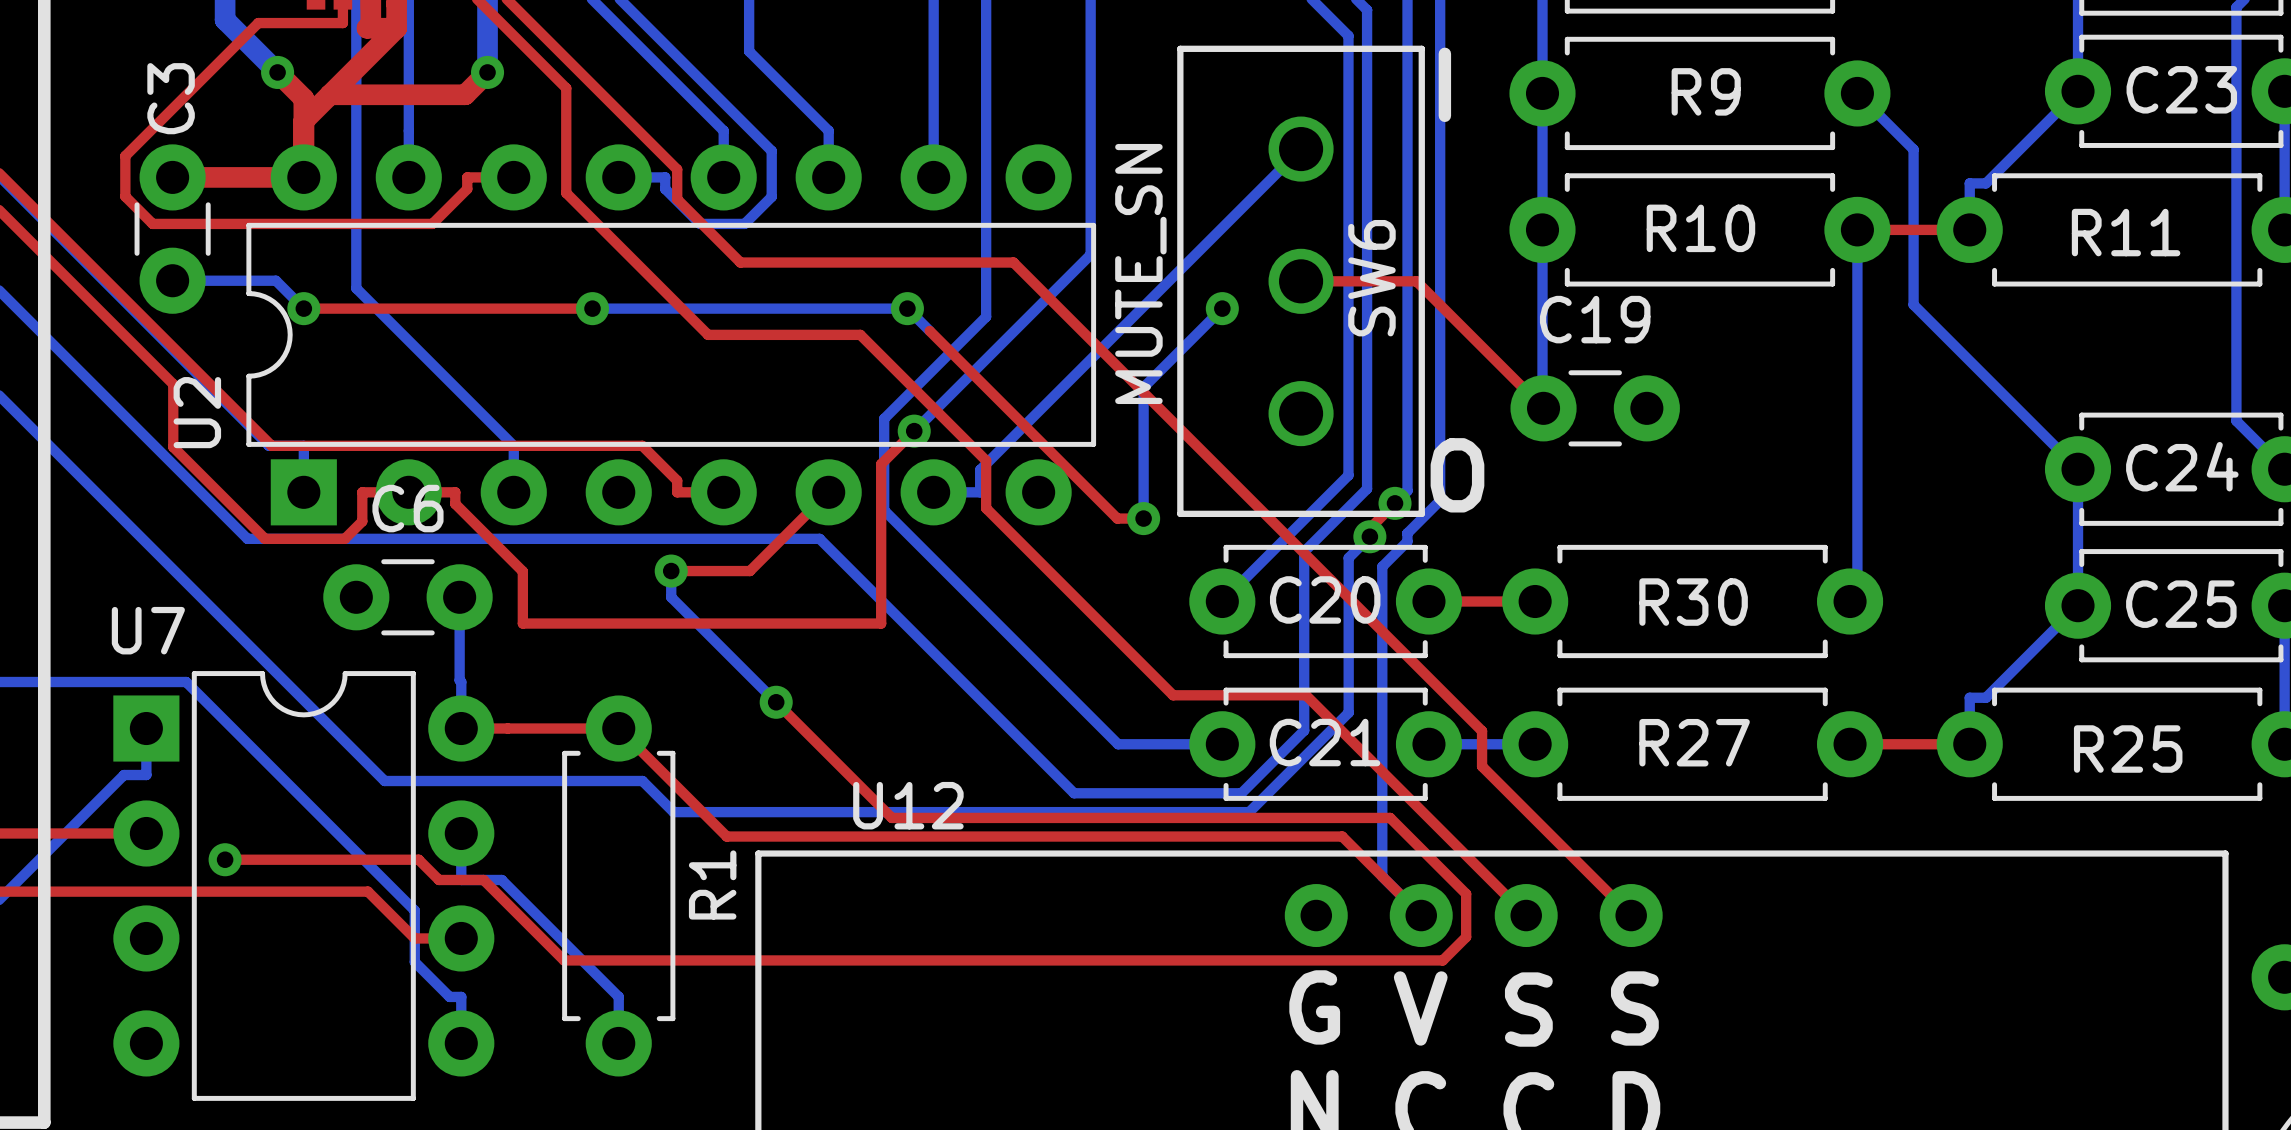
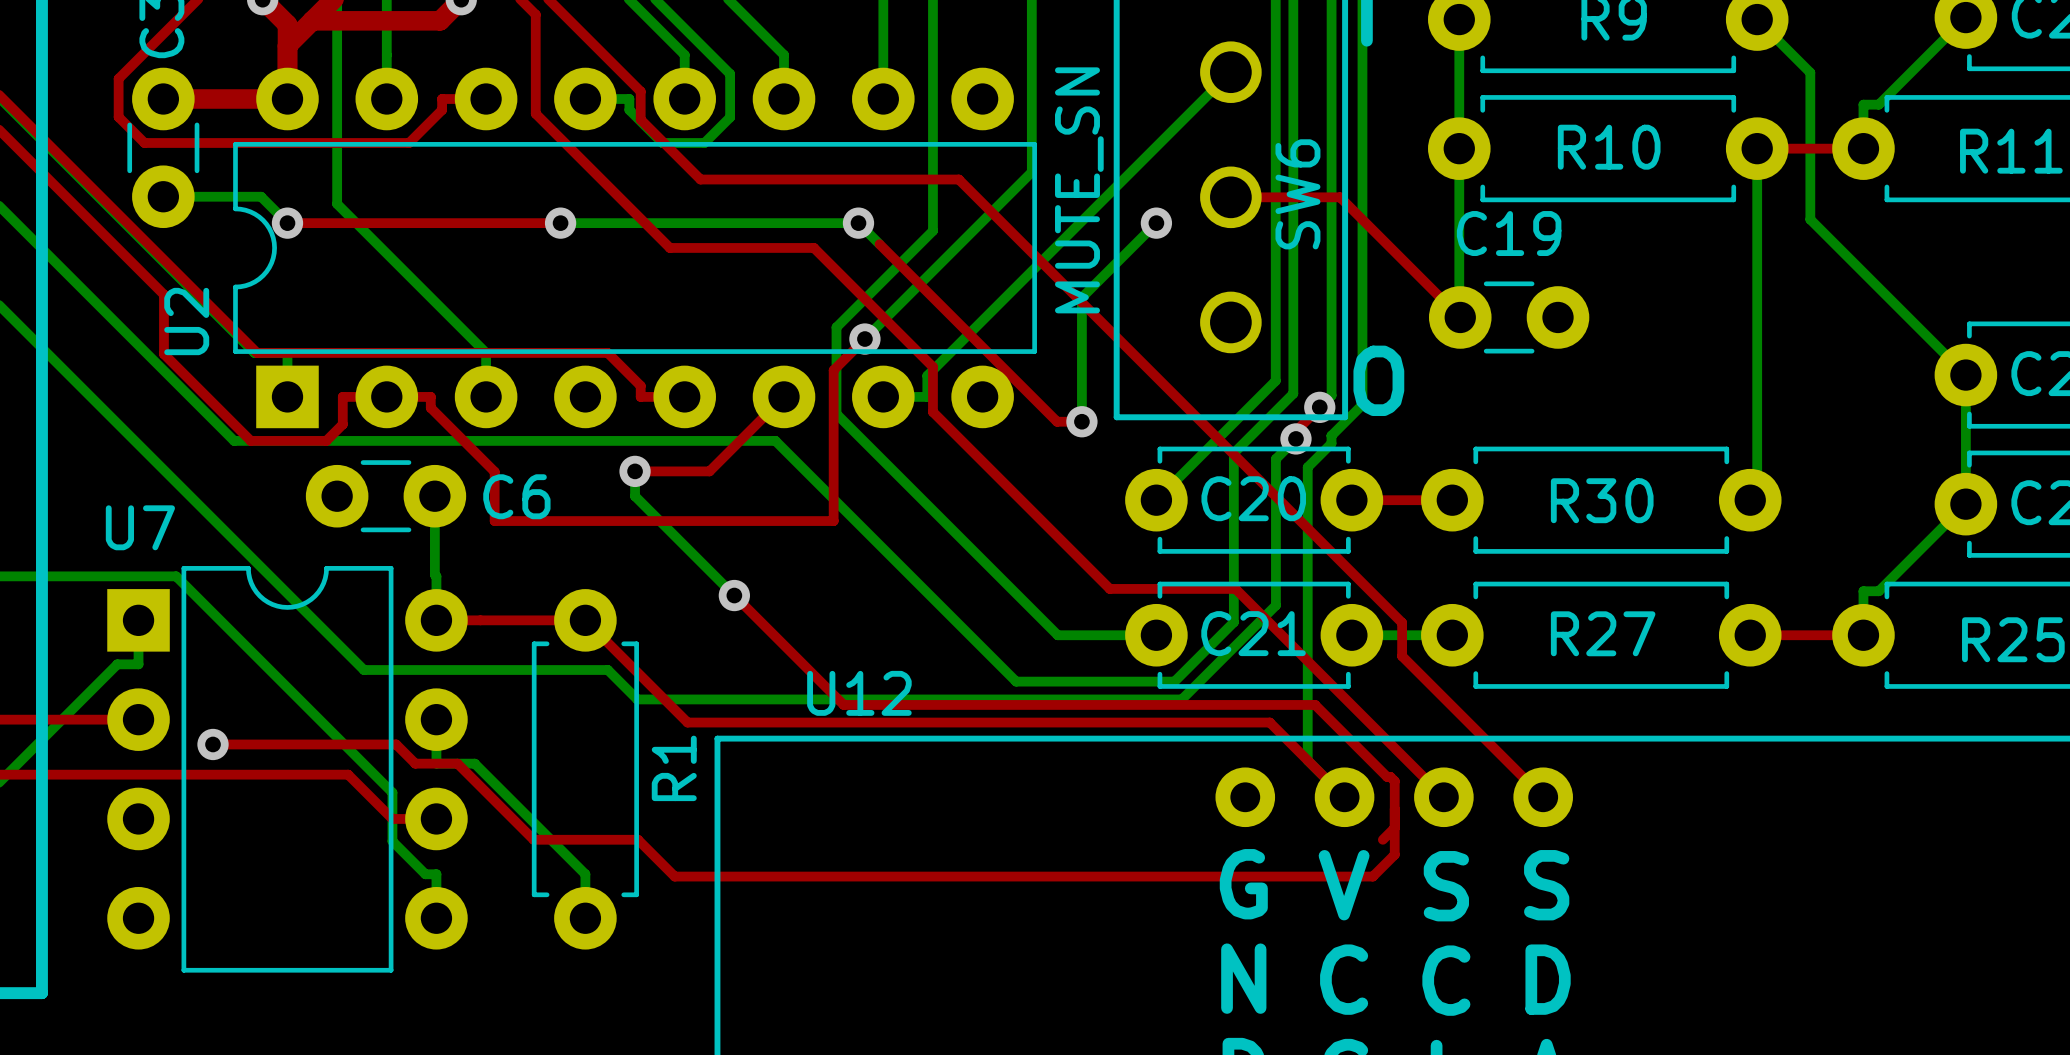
C6 name position: C6 (407, 508) -> C6 (516, 496)
top track: (1466, 893) (1466, 937) (1442, 960) (674, 960) -> (1387, 776) (1390, 776) (1394, 781) (1394, 854) (1372, 876) (674, 876) (637, 839)
top track: none -> (1394, 827) (1382, 839)

